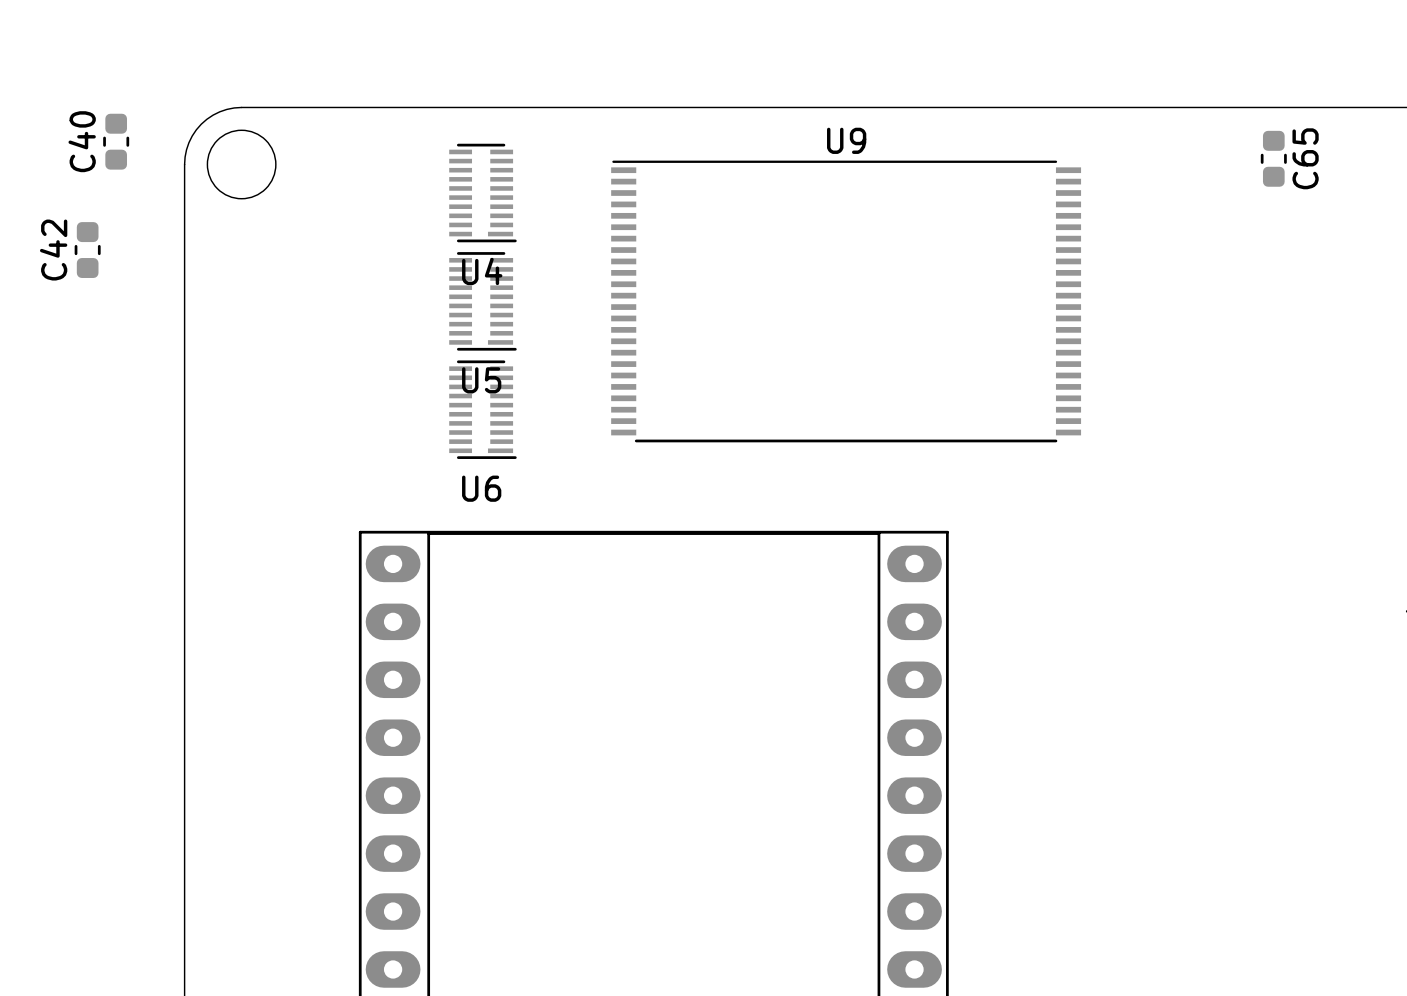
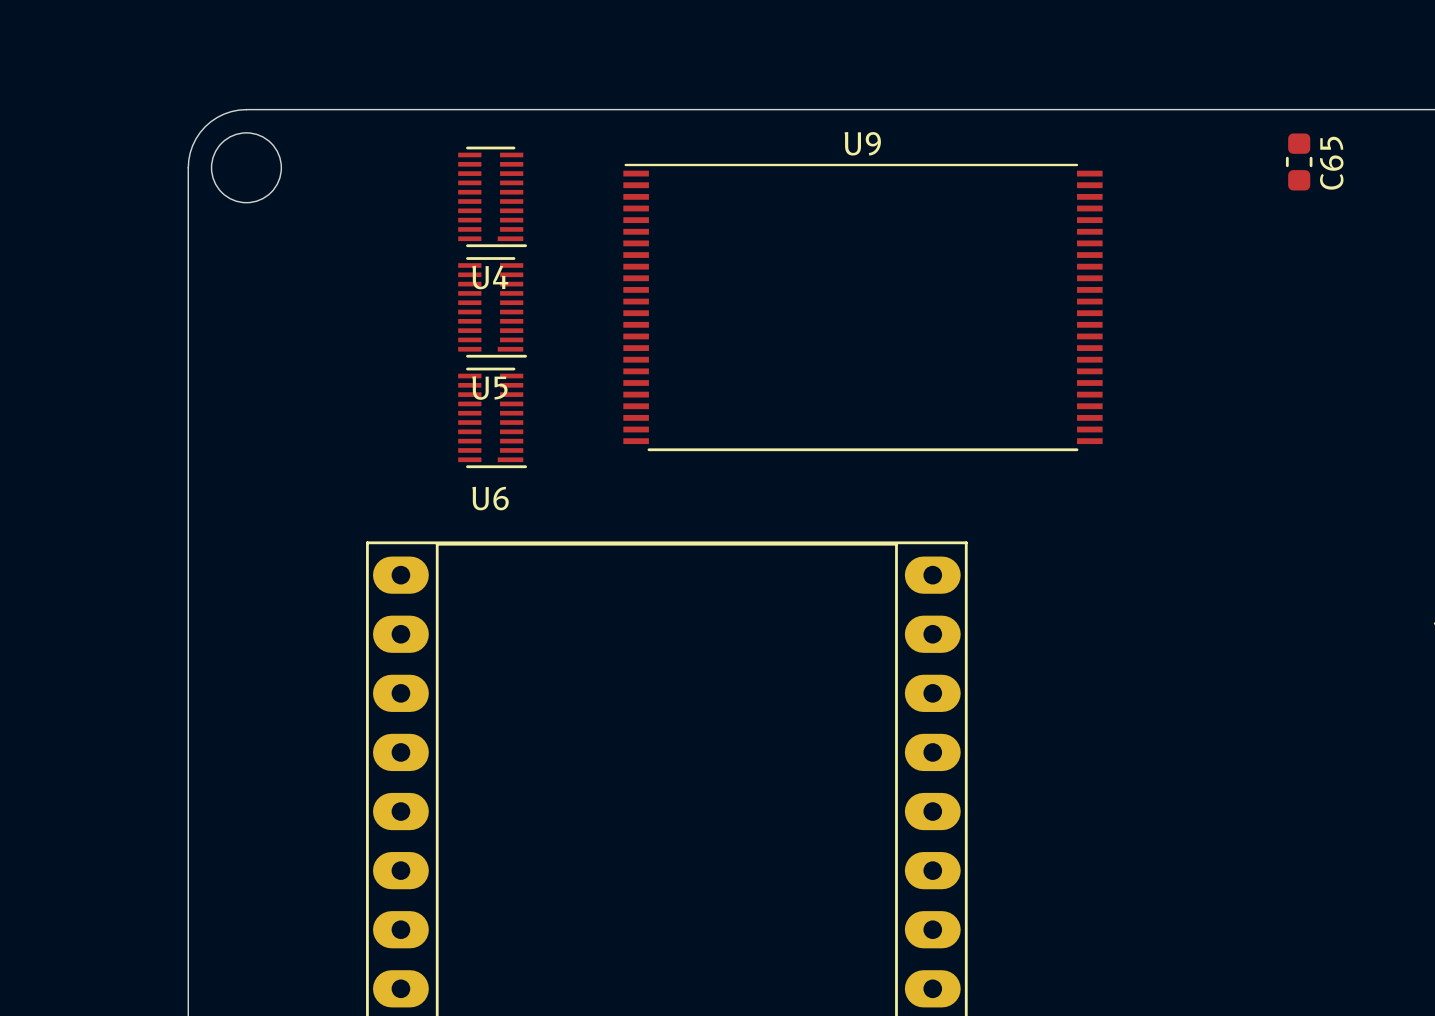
C40: (116, 141) -> none
C42: (87, 250) -> none

